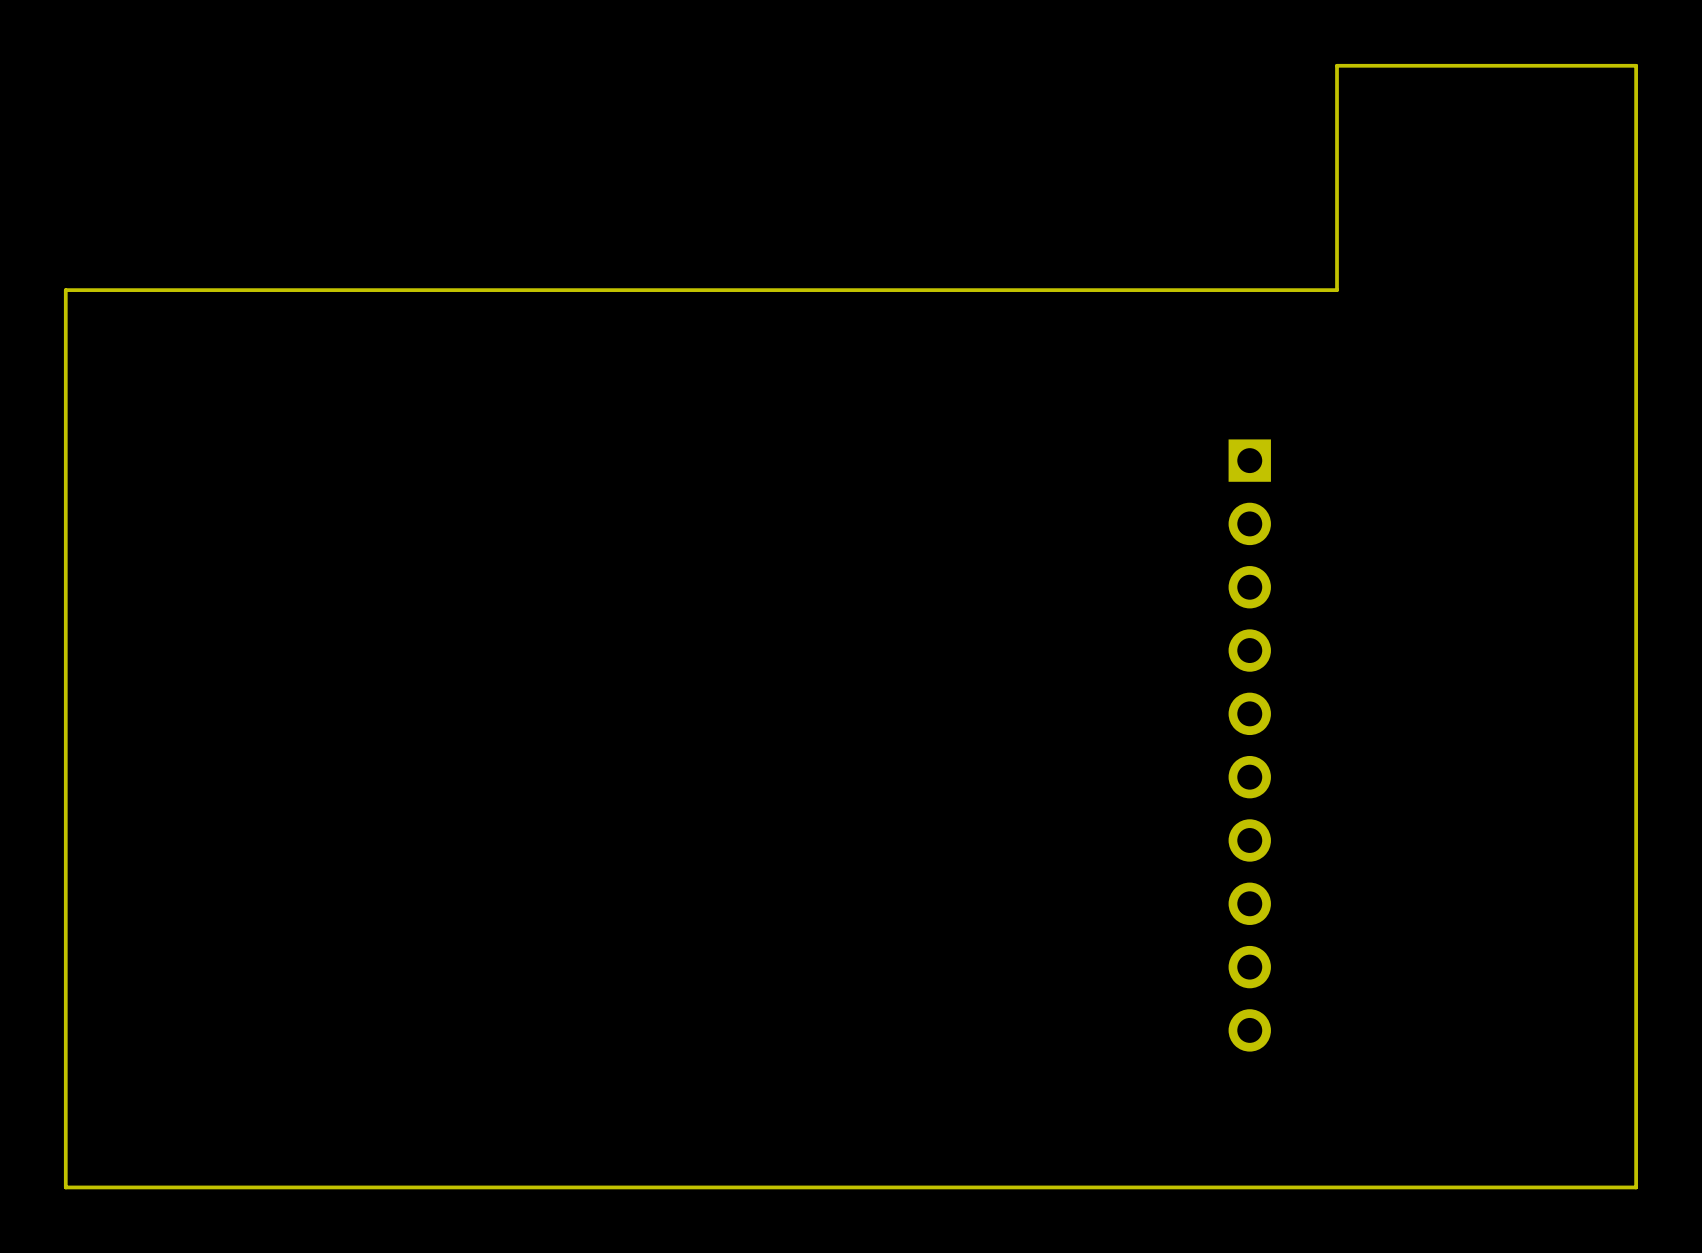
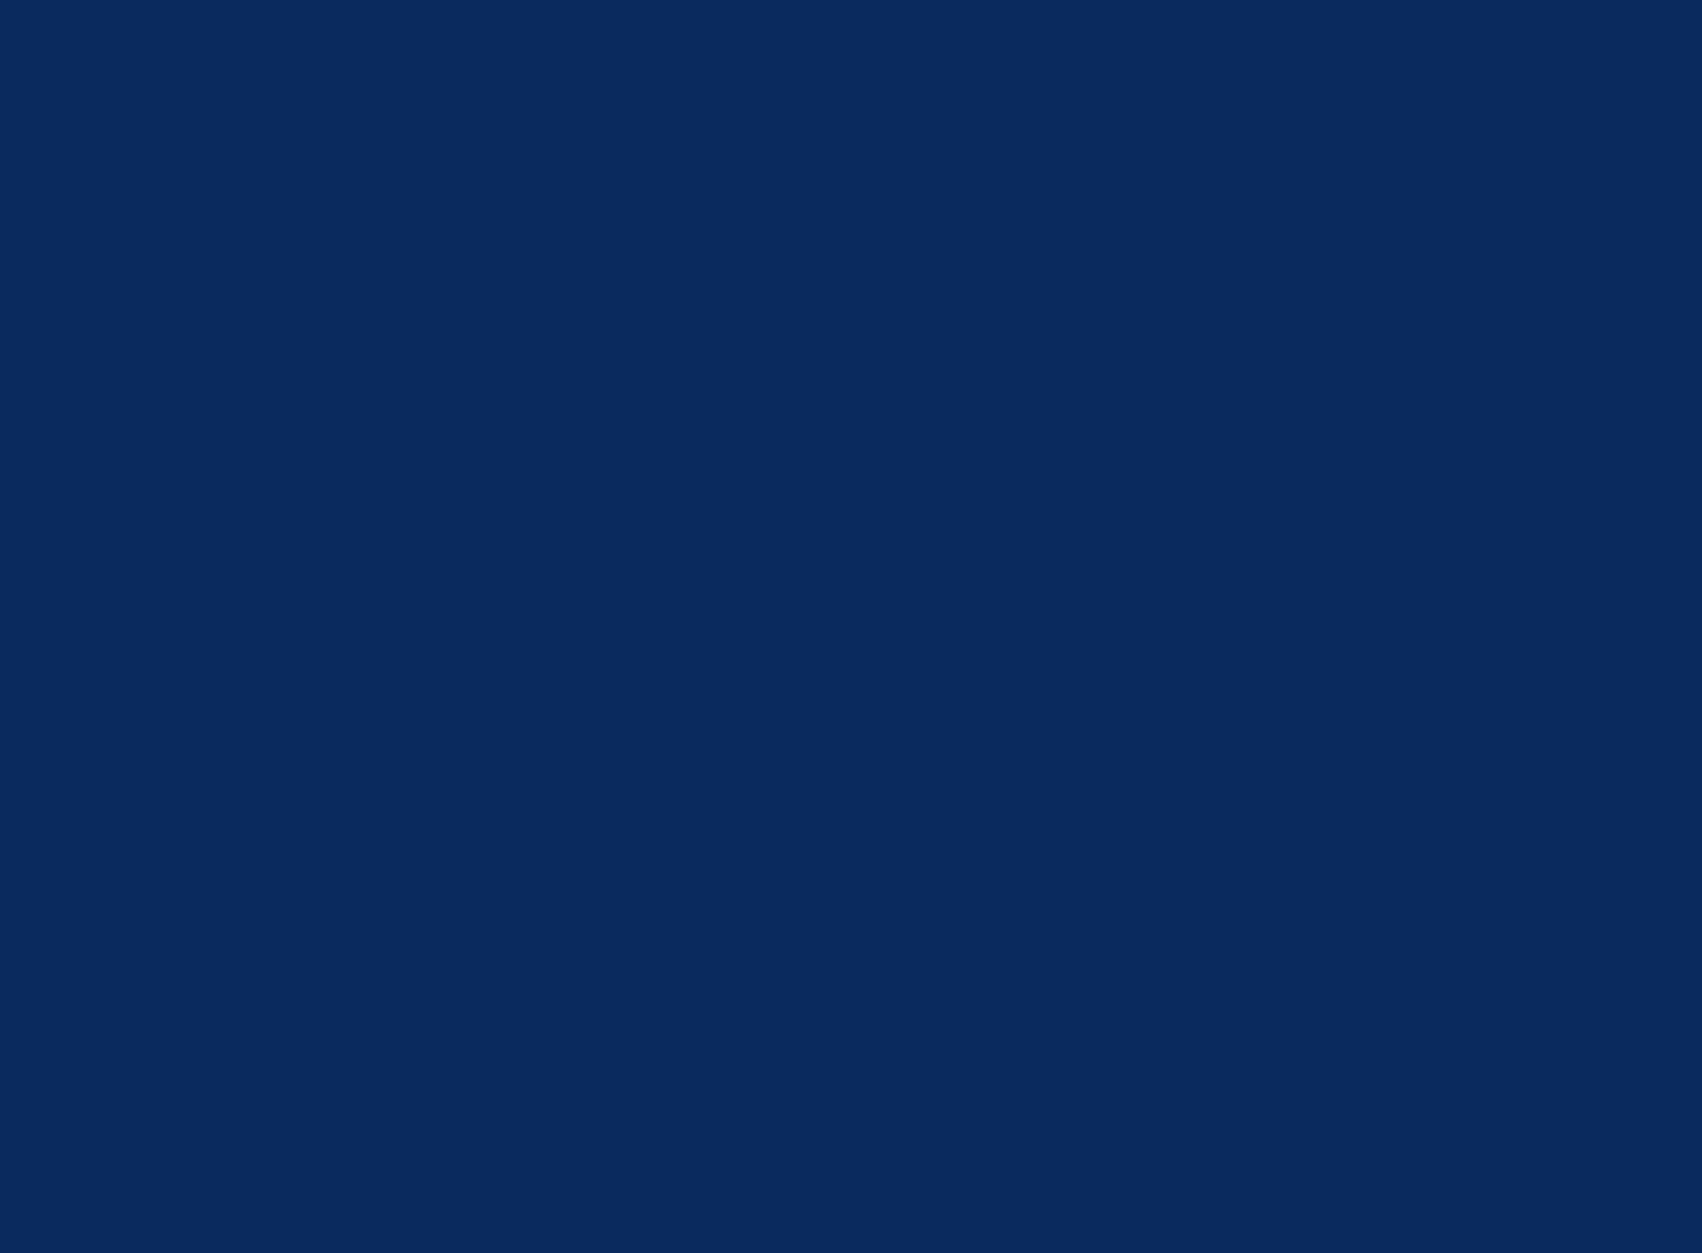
board edge: (1636, 65) (1337, 65) (1337, 290) (65, 290) (65, 1187) (1636, 1187) (1636, 65) -> none
part: (1249, 745) -> none

